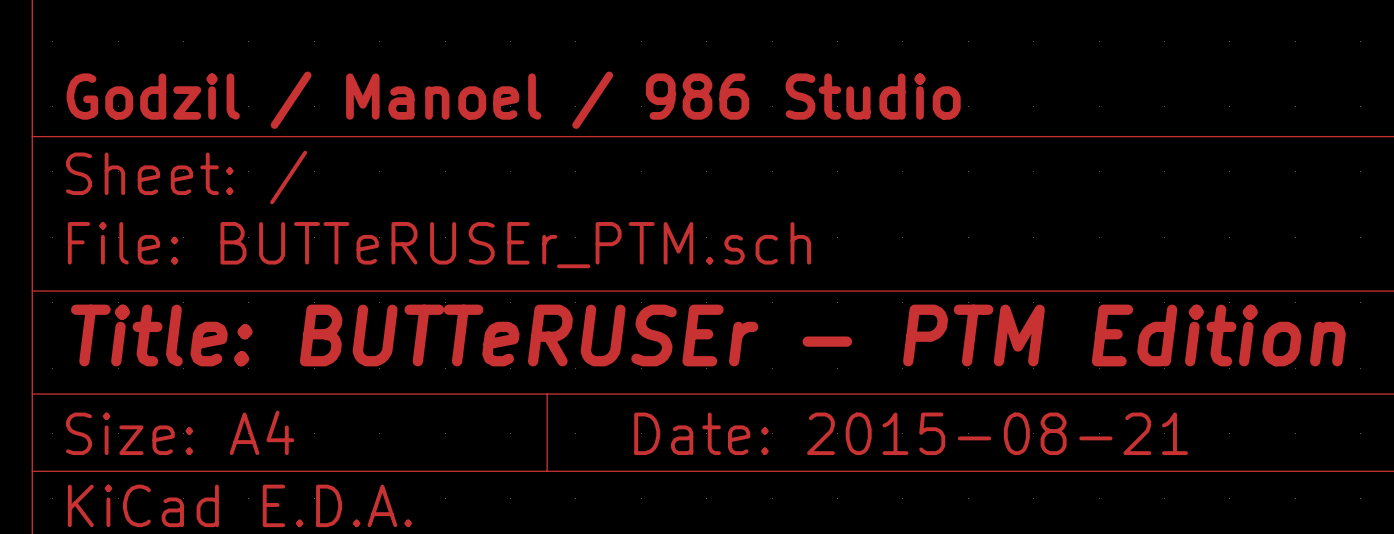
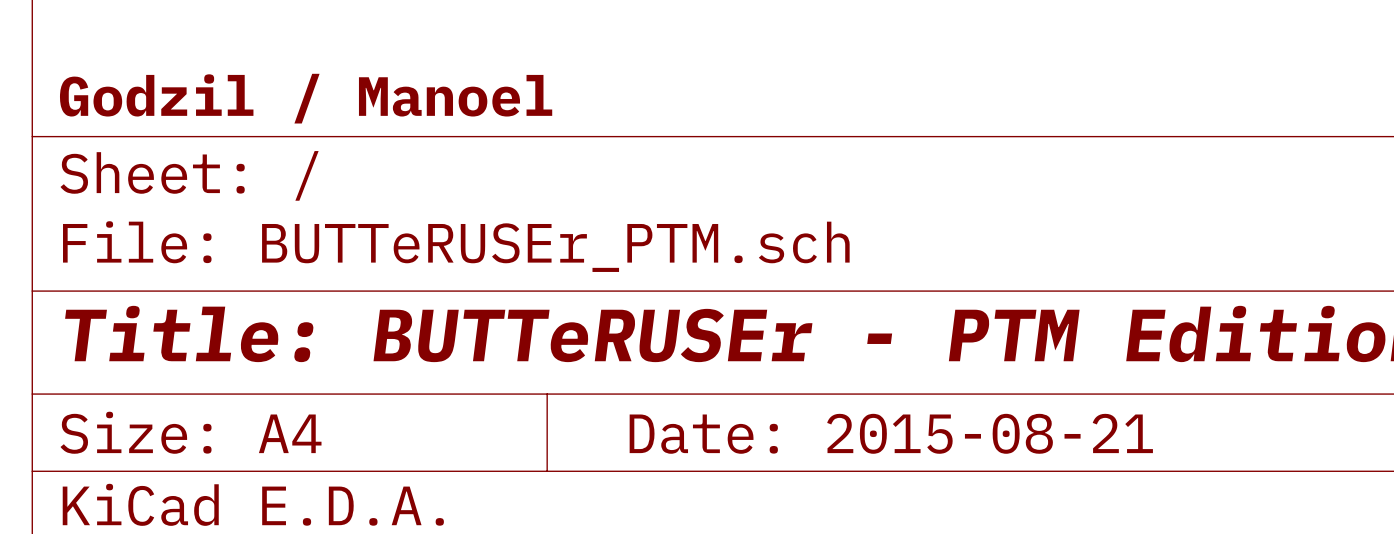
title block: Godzil / Manoel / 986 Studio (513, 100) -> Godzil / Manoel (306, 98)

